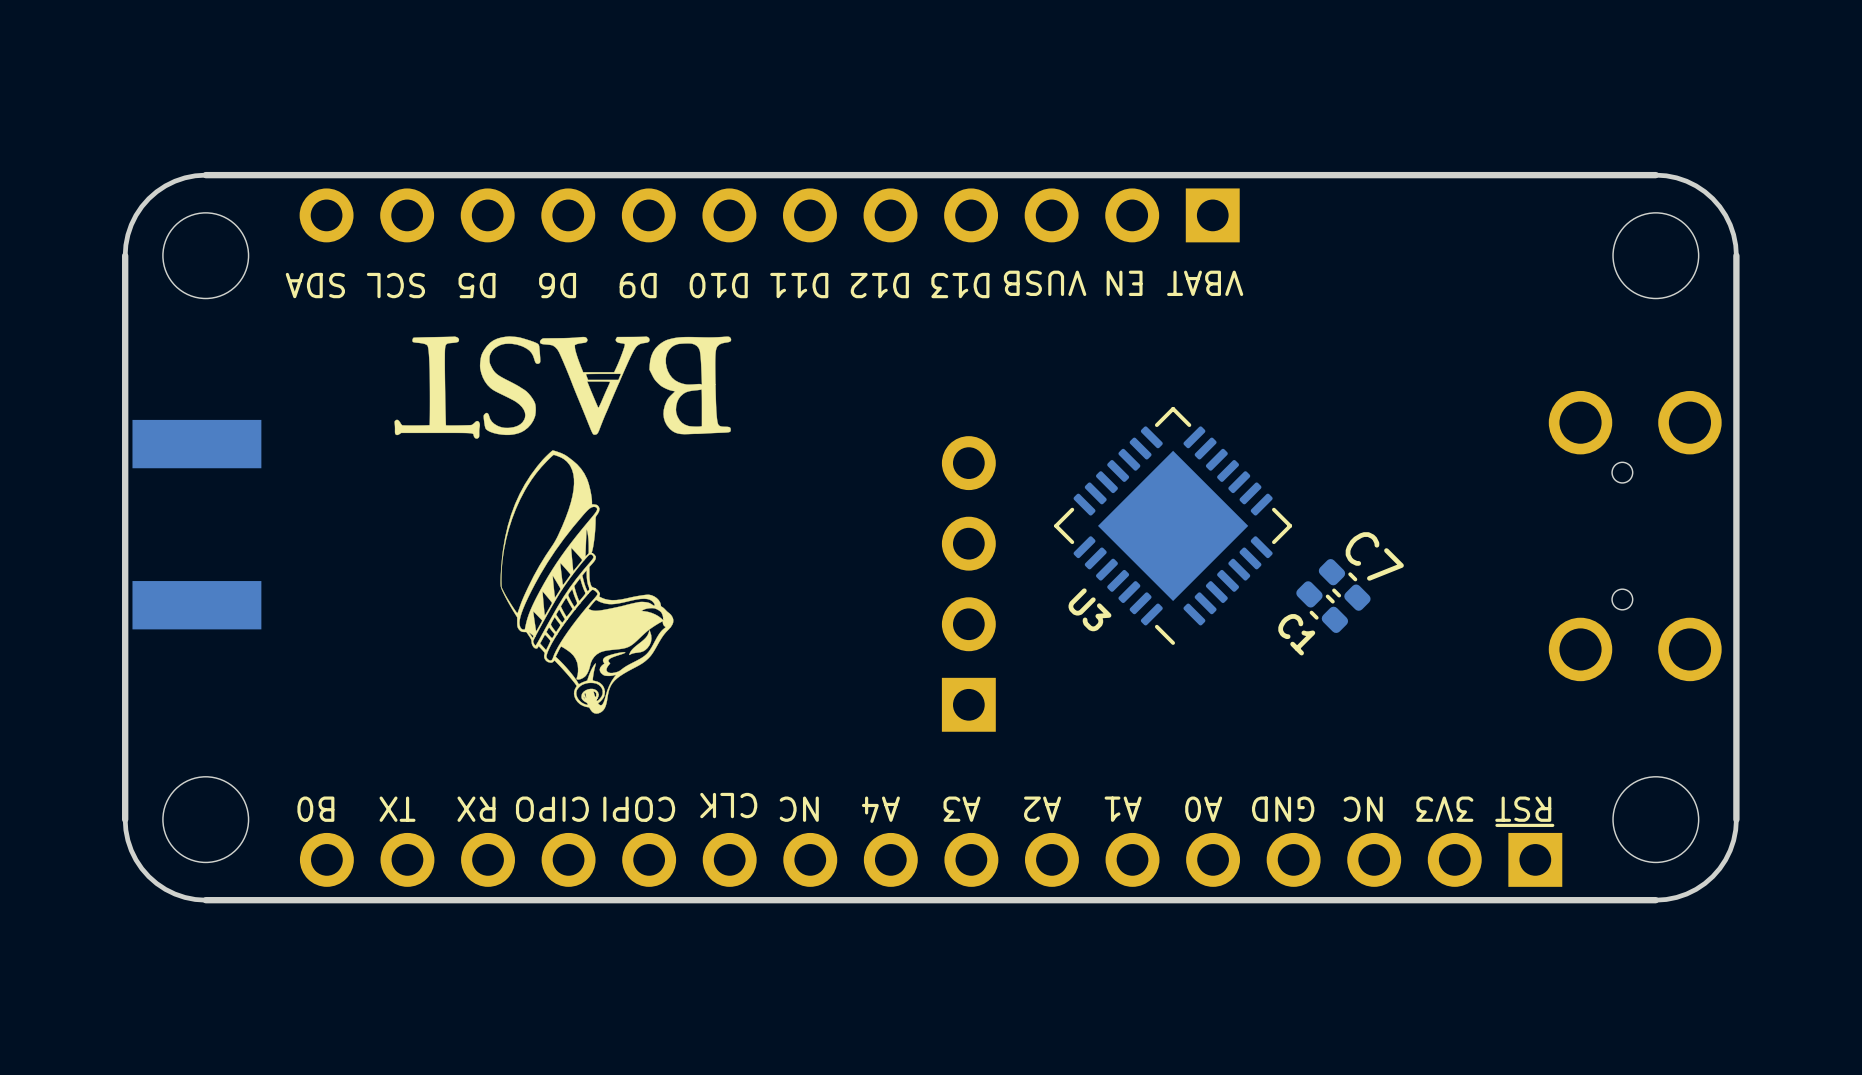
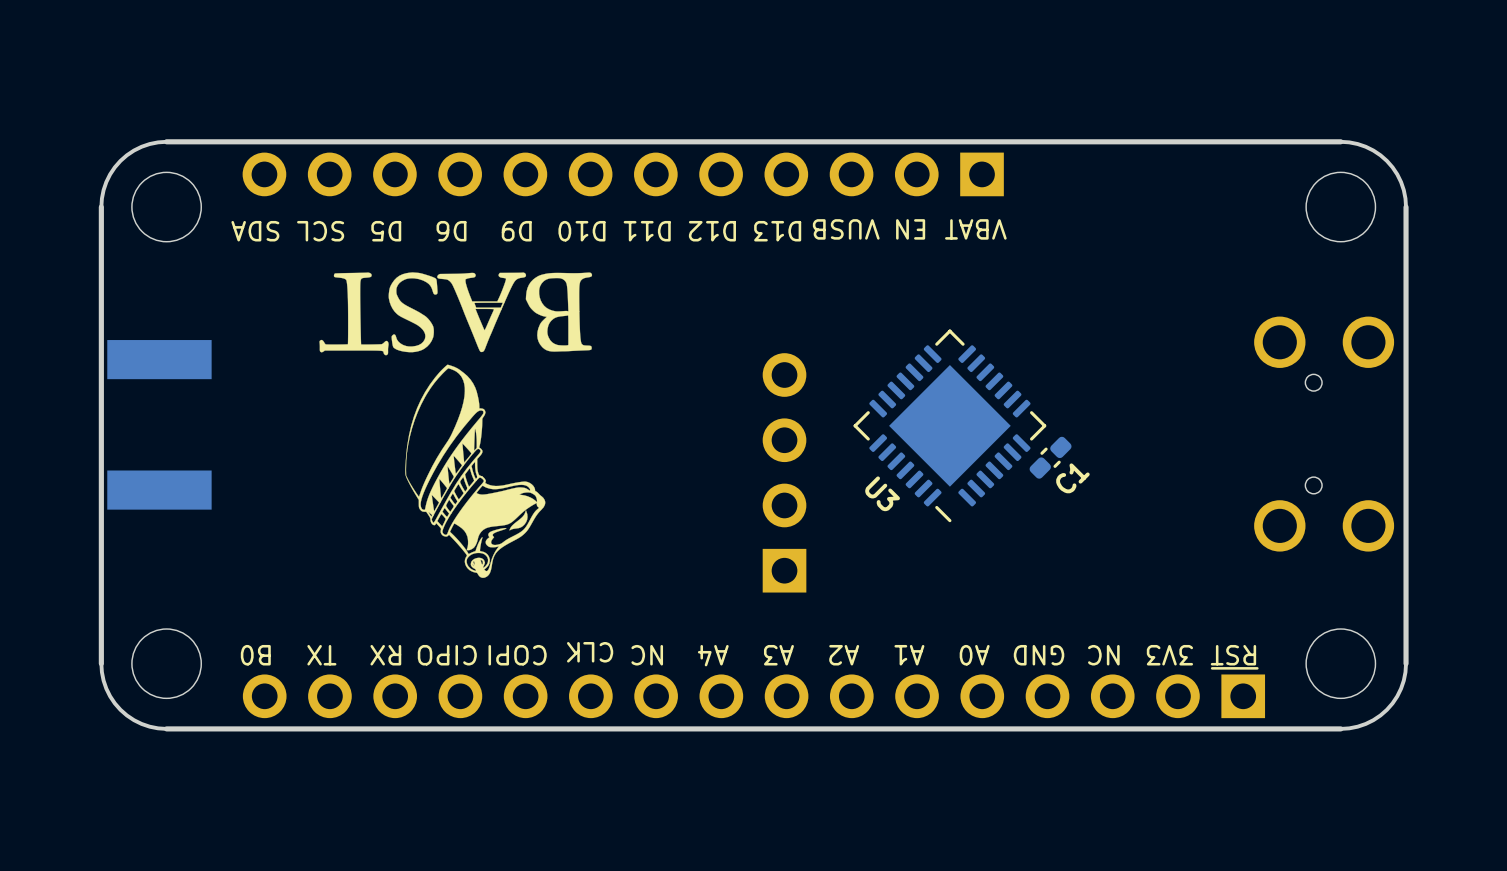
C7: (1344, 584) -> none
C1 rotation: 0° (1322, 607) -> 90° clockwise (1050, 457)
C1 position: (1322, 607) -> (1050, 457)

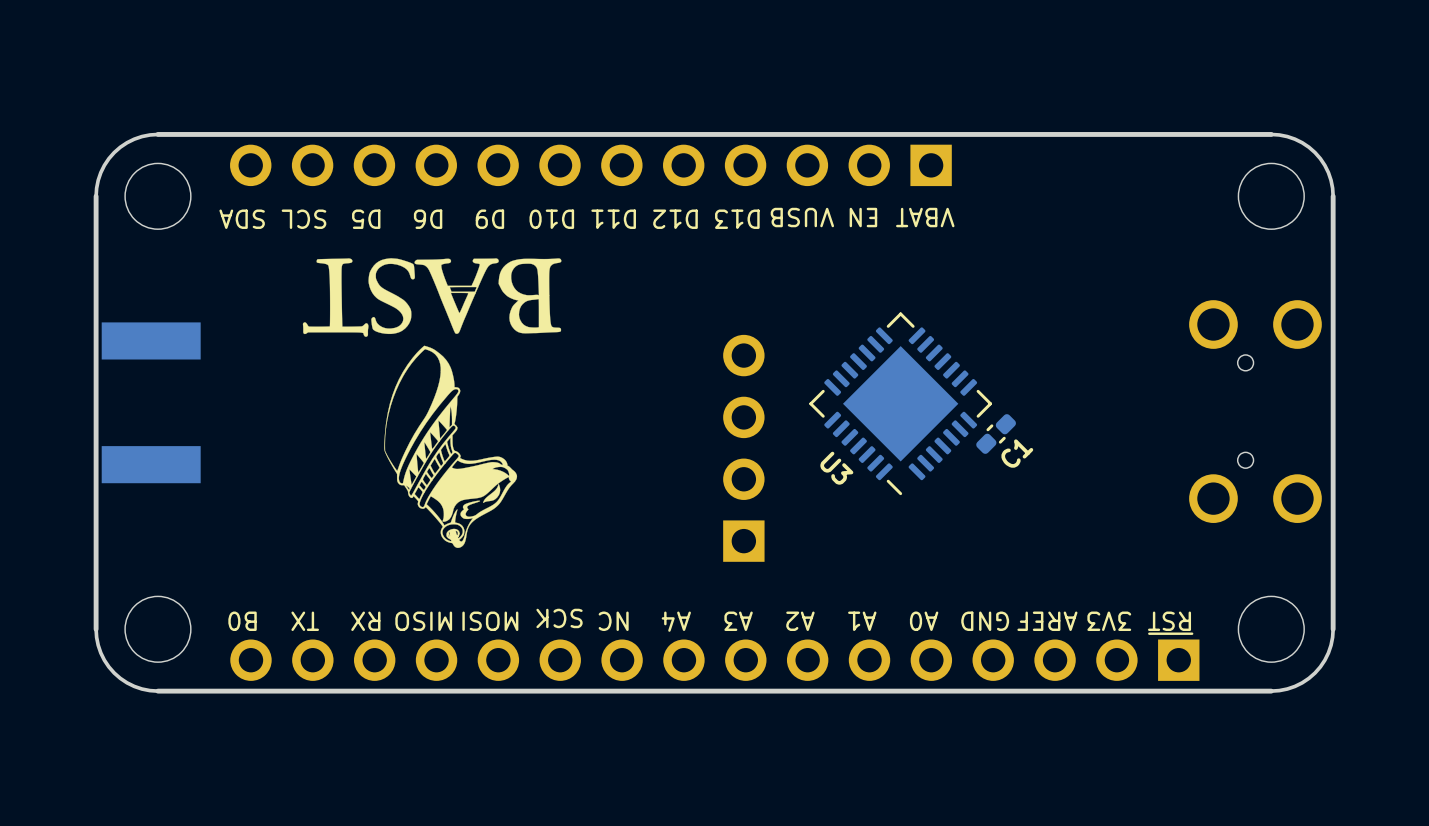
text: CLK (590, 652) -> SCK (559, 618)
text: CIPO (447, 655) -> MISO (423, 621)
text: COPI (517, 655) -> MOSI (490, 621)
text: NC (1103, 655) -> AREF (1047, 621)

